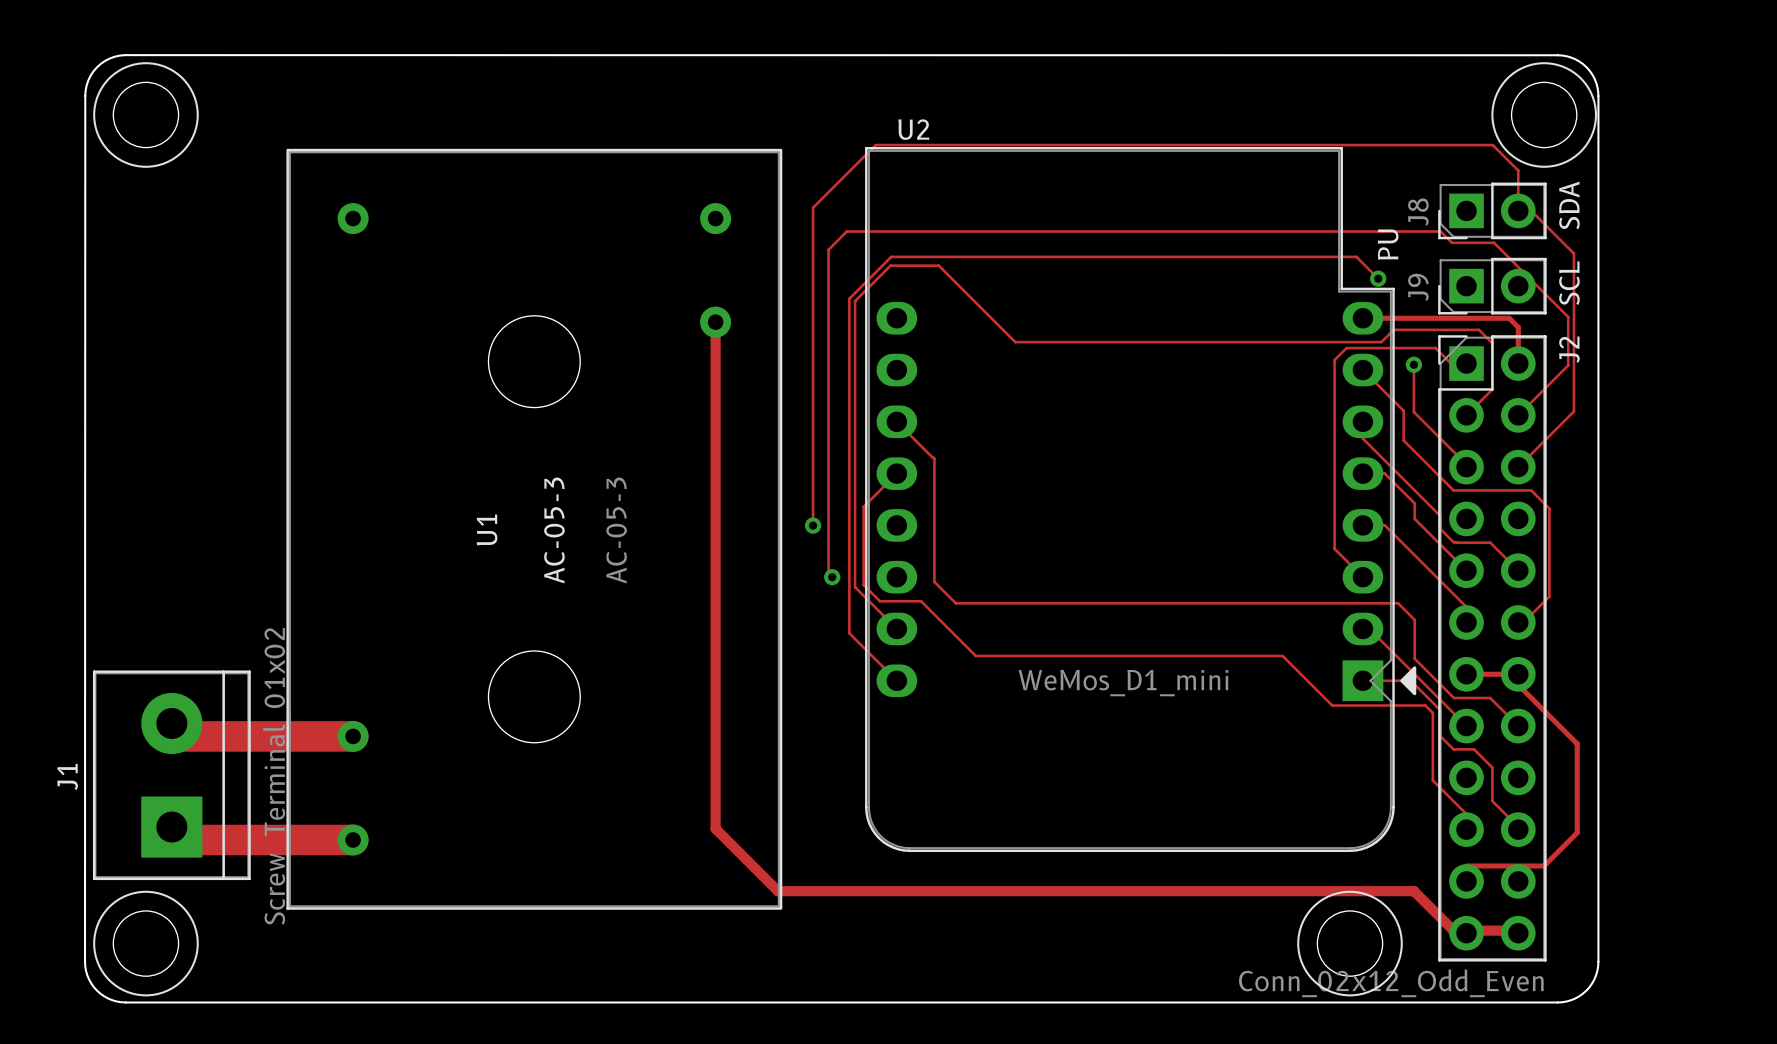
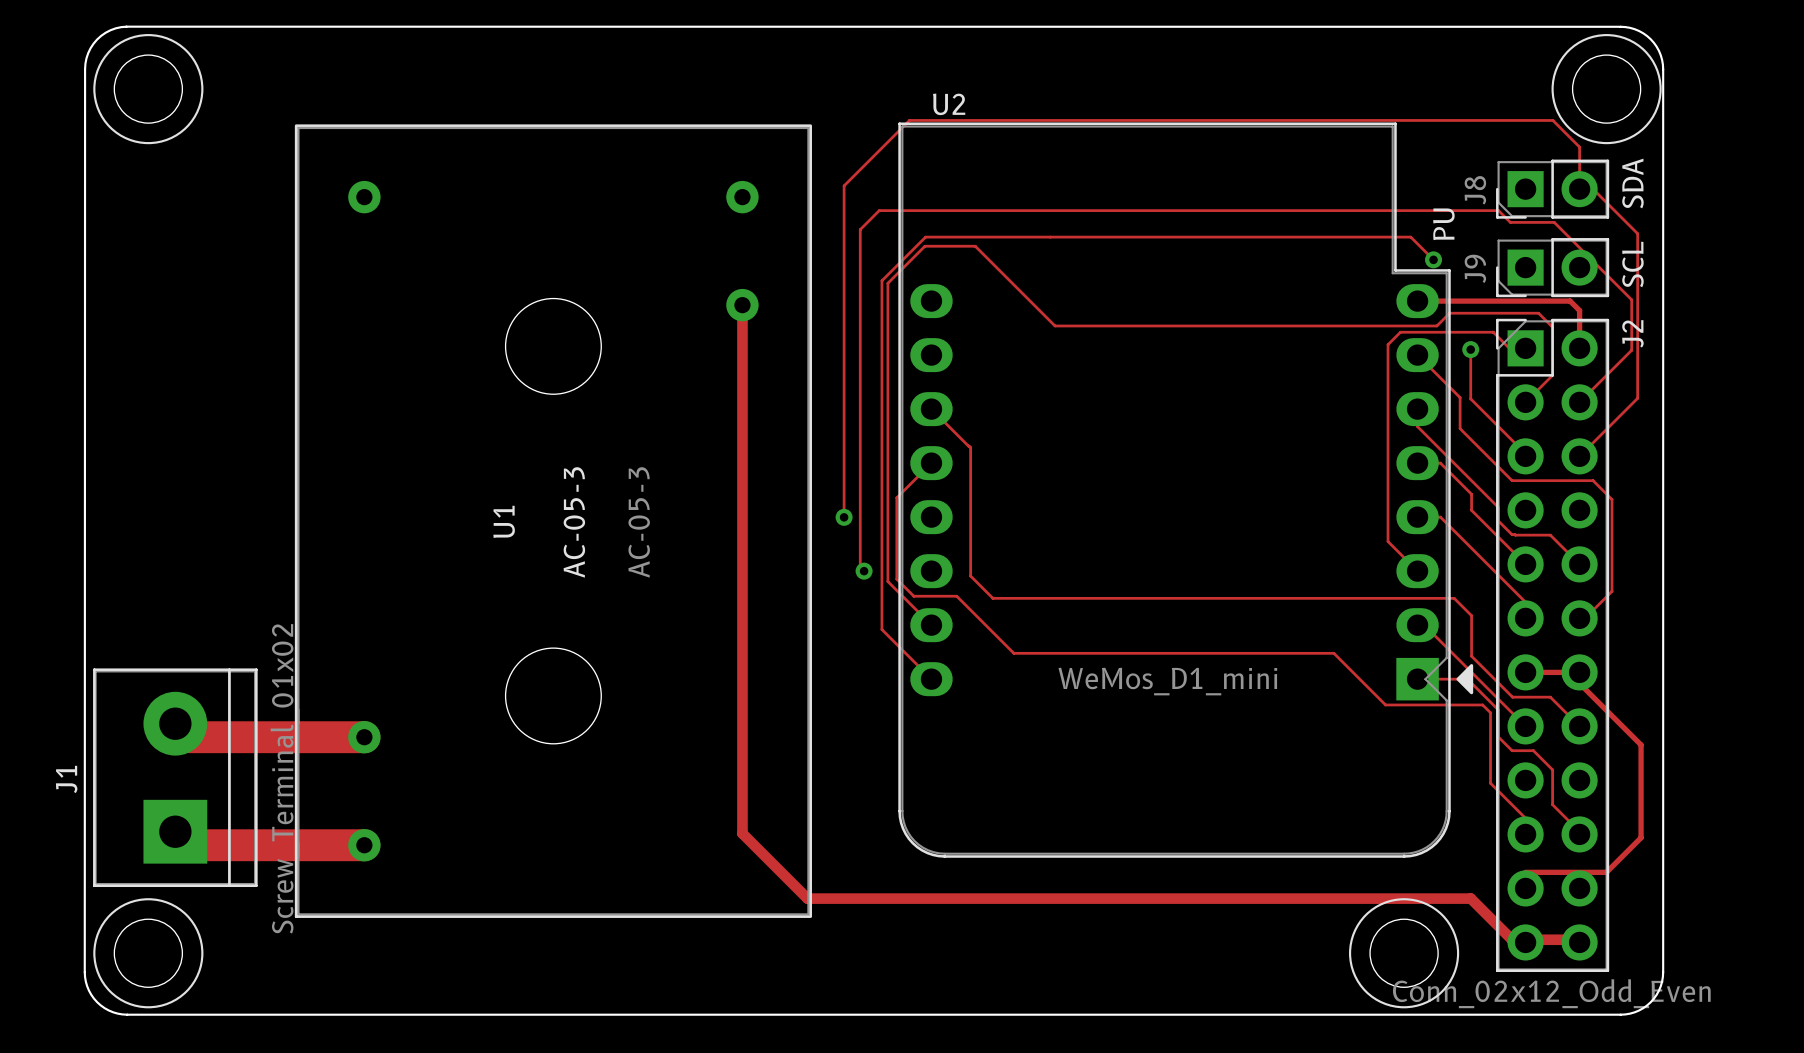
J2 value position: Conn_02x12_Odd_Even (1391, 983) -> Conn_02x12_Odd_Even (1551, 993)

